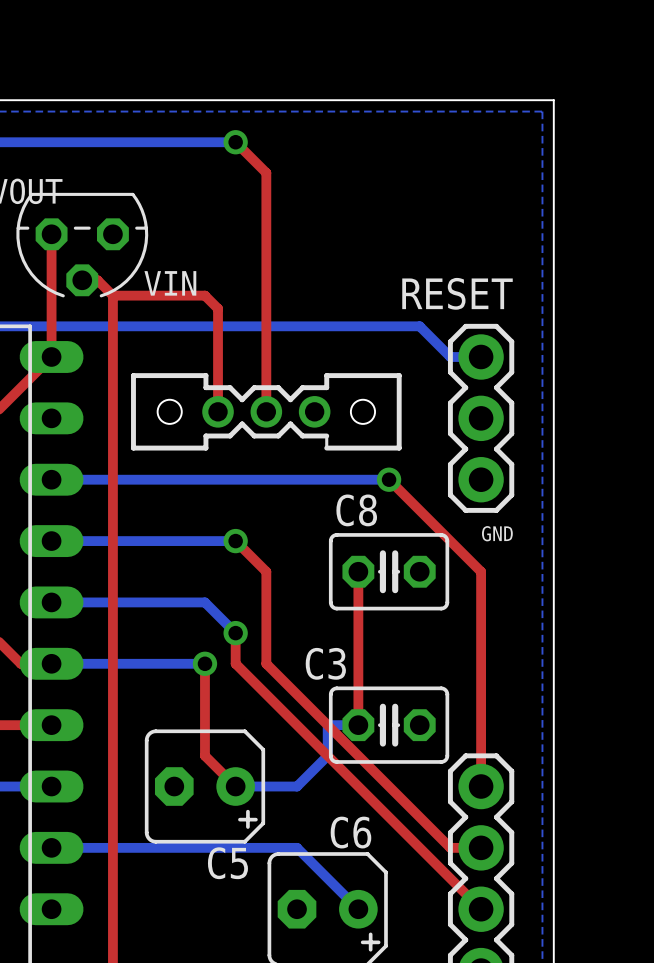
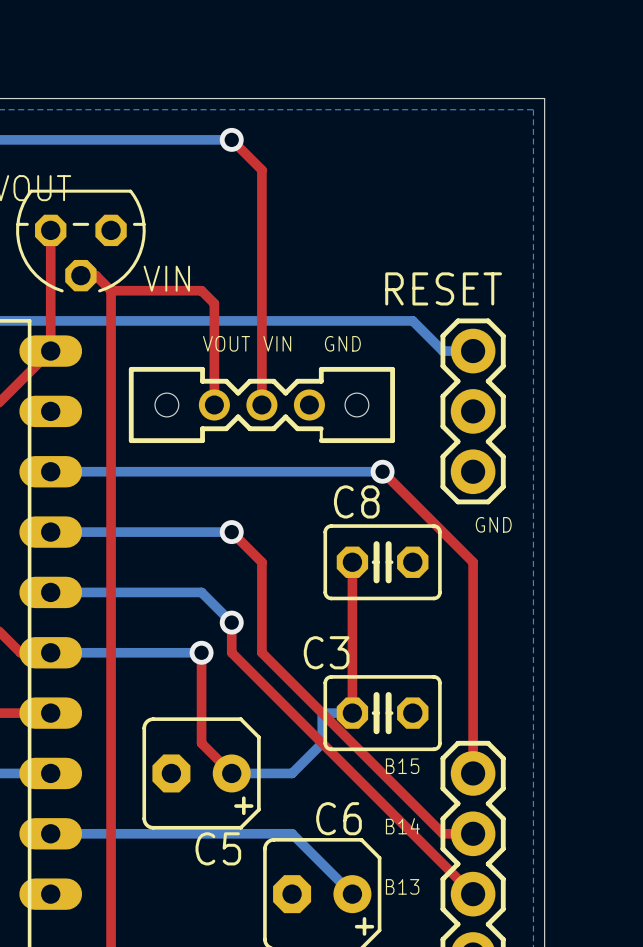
text: none -> VOUT (226, 343)
text: none -> VIN (277, 343)
text: none -> GND (342, 343)
text: none -> B15 (402, 766)
text: none -> B14 (402, 826)
text: none -> B13 (402, 886)

